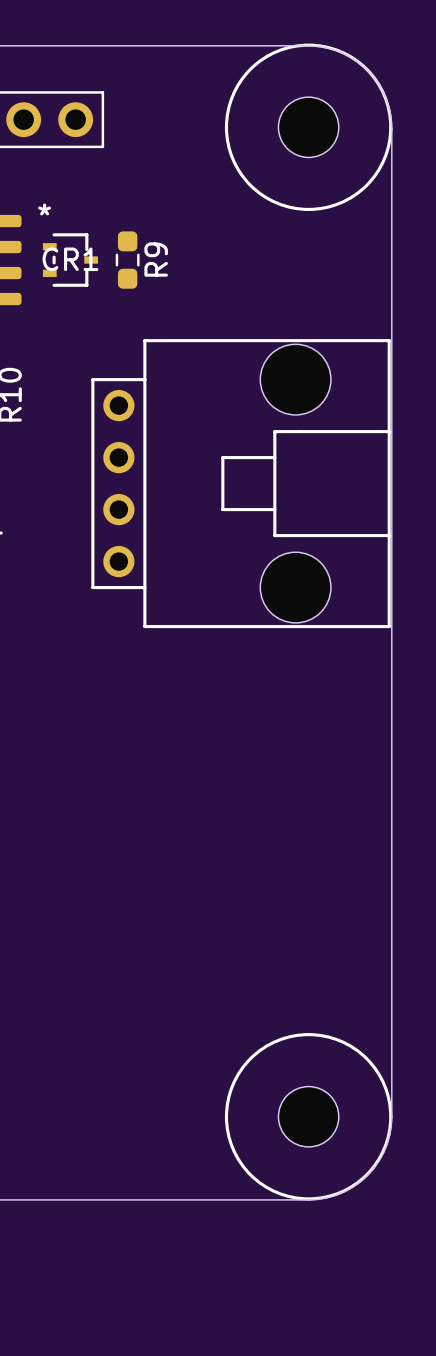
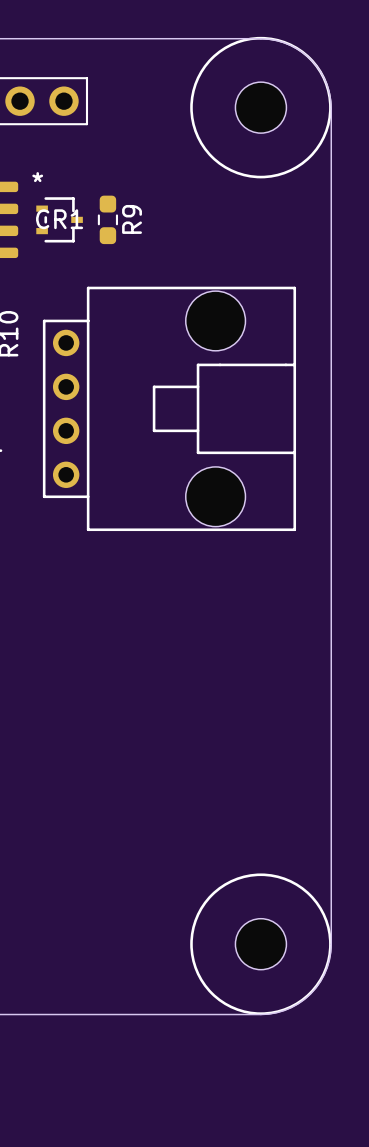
part position: (241, 483) -> (169, 408)

